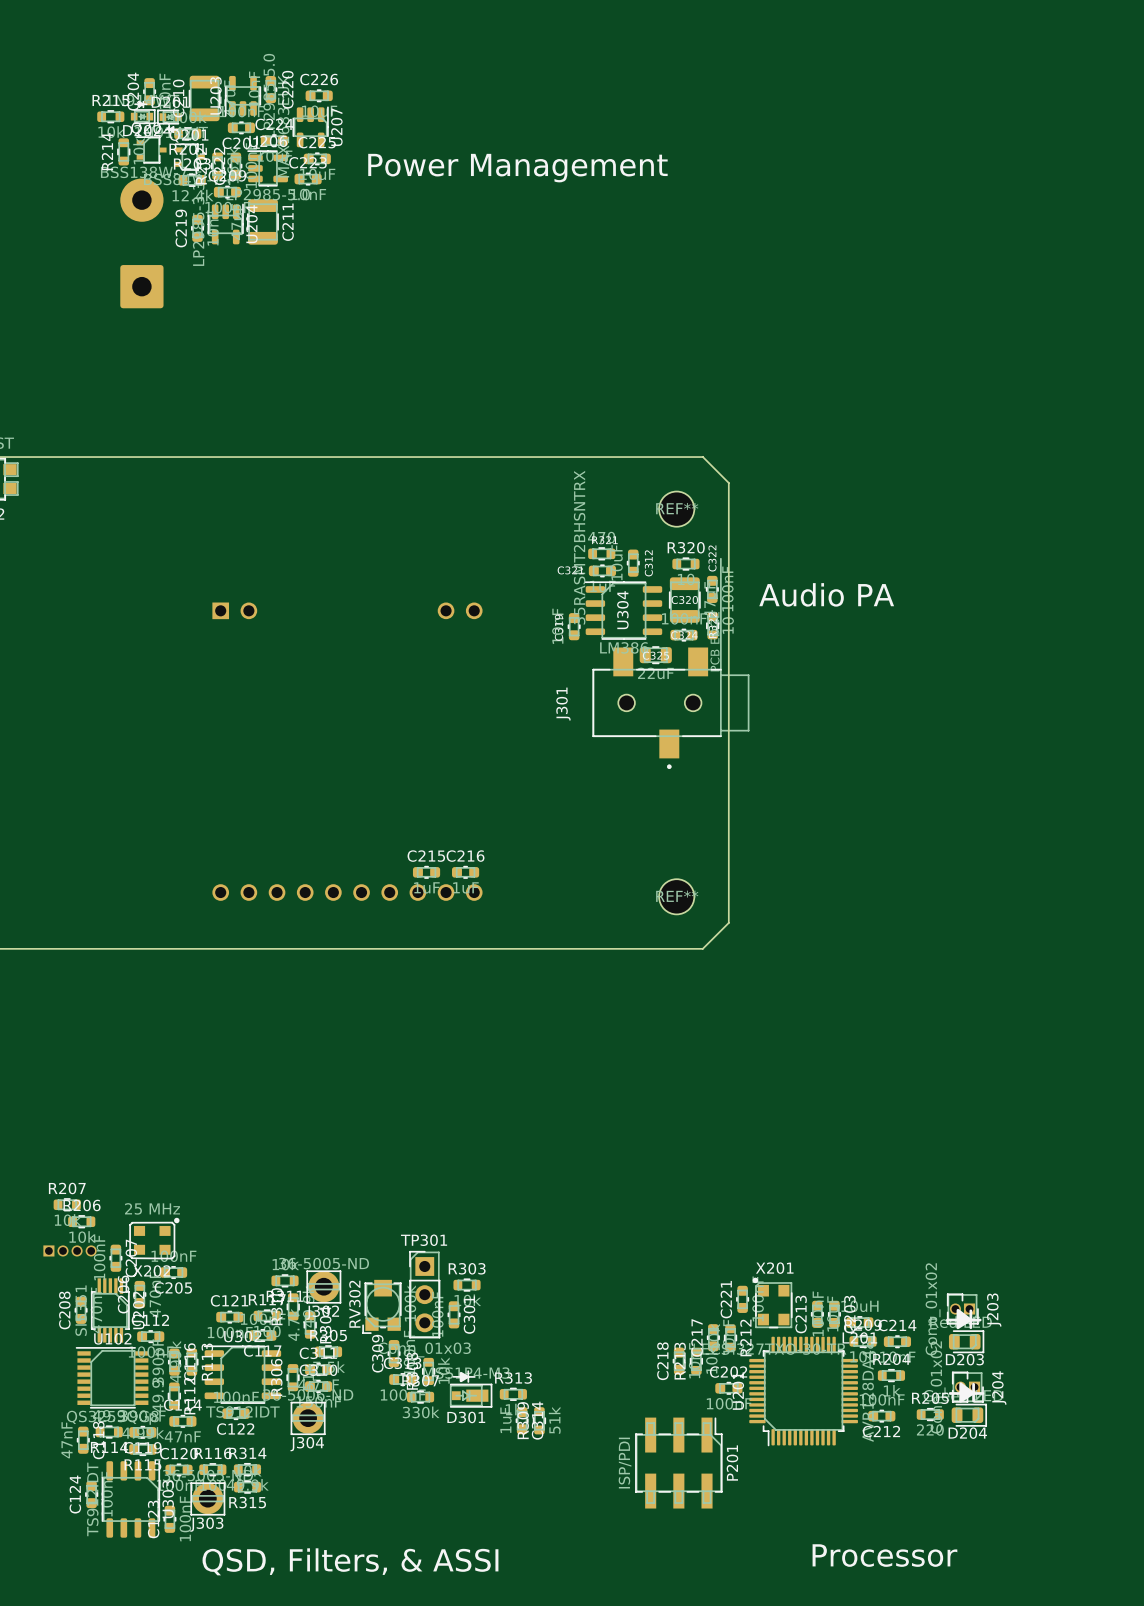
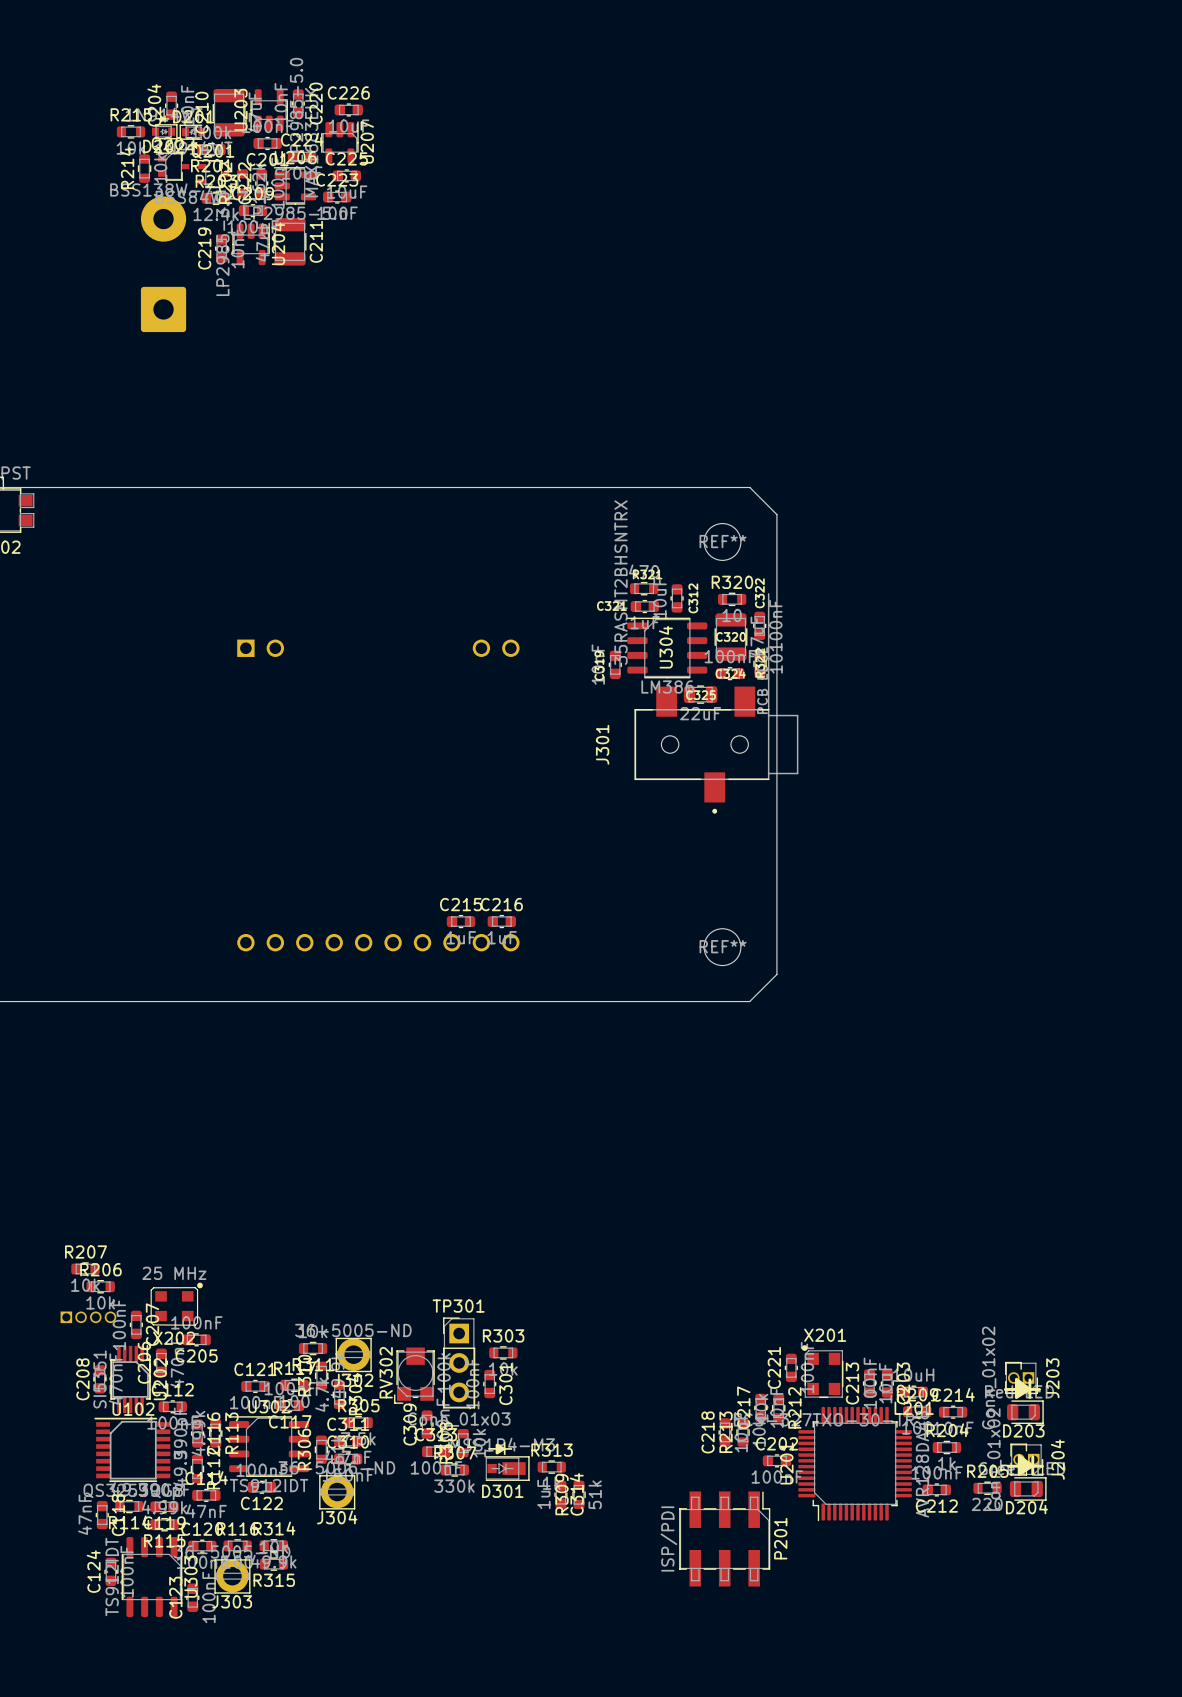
text: Power Management (517, 168) -> none
text: Audio PA (826, 594) -> none
text: Processor (884, 1555) -> none
text: QSD, Filters, & ASSI (350, 1561) -> none

